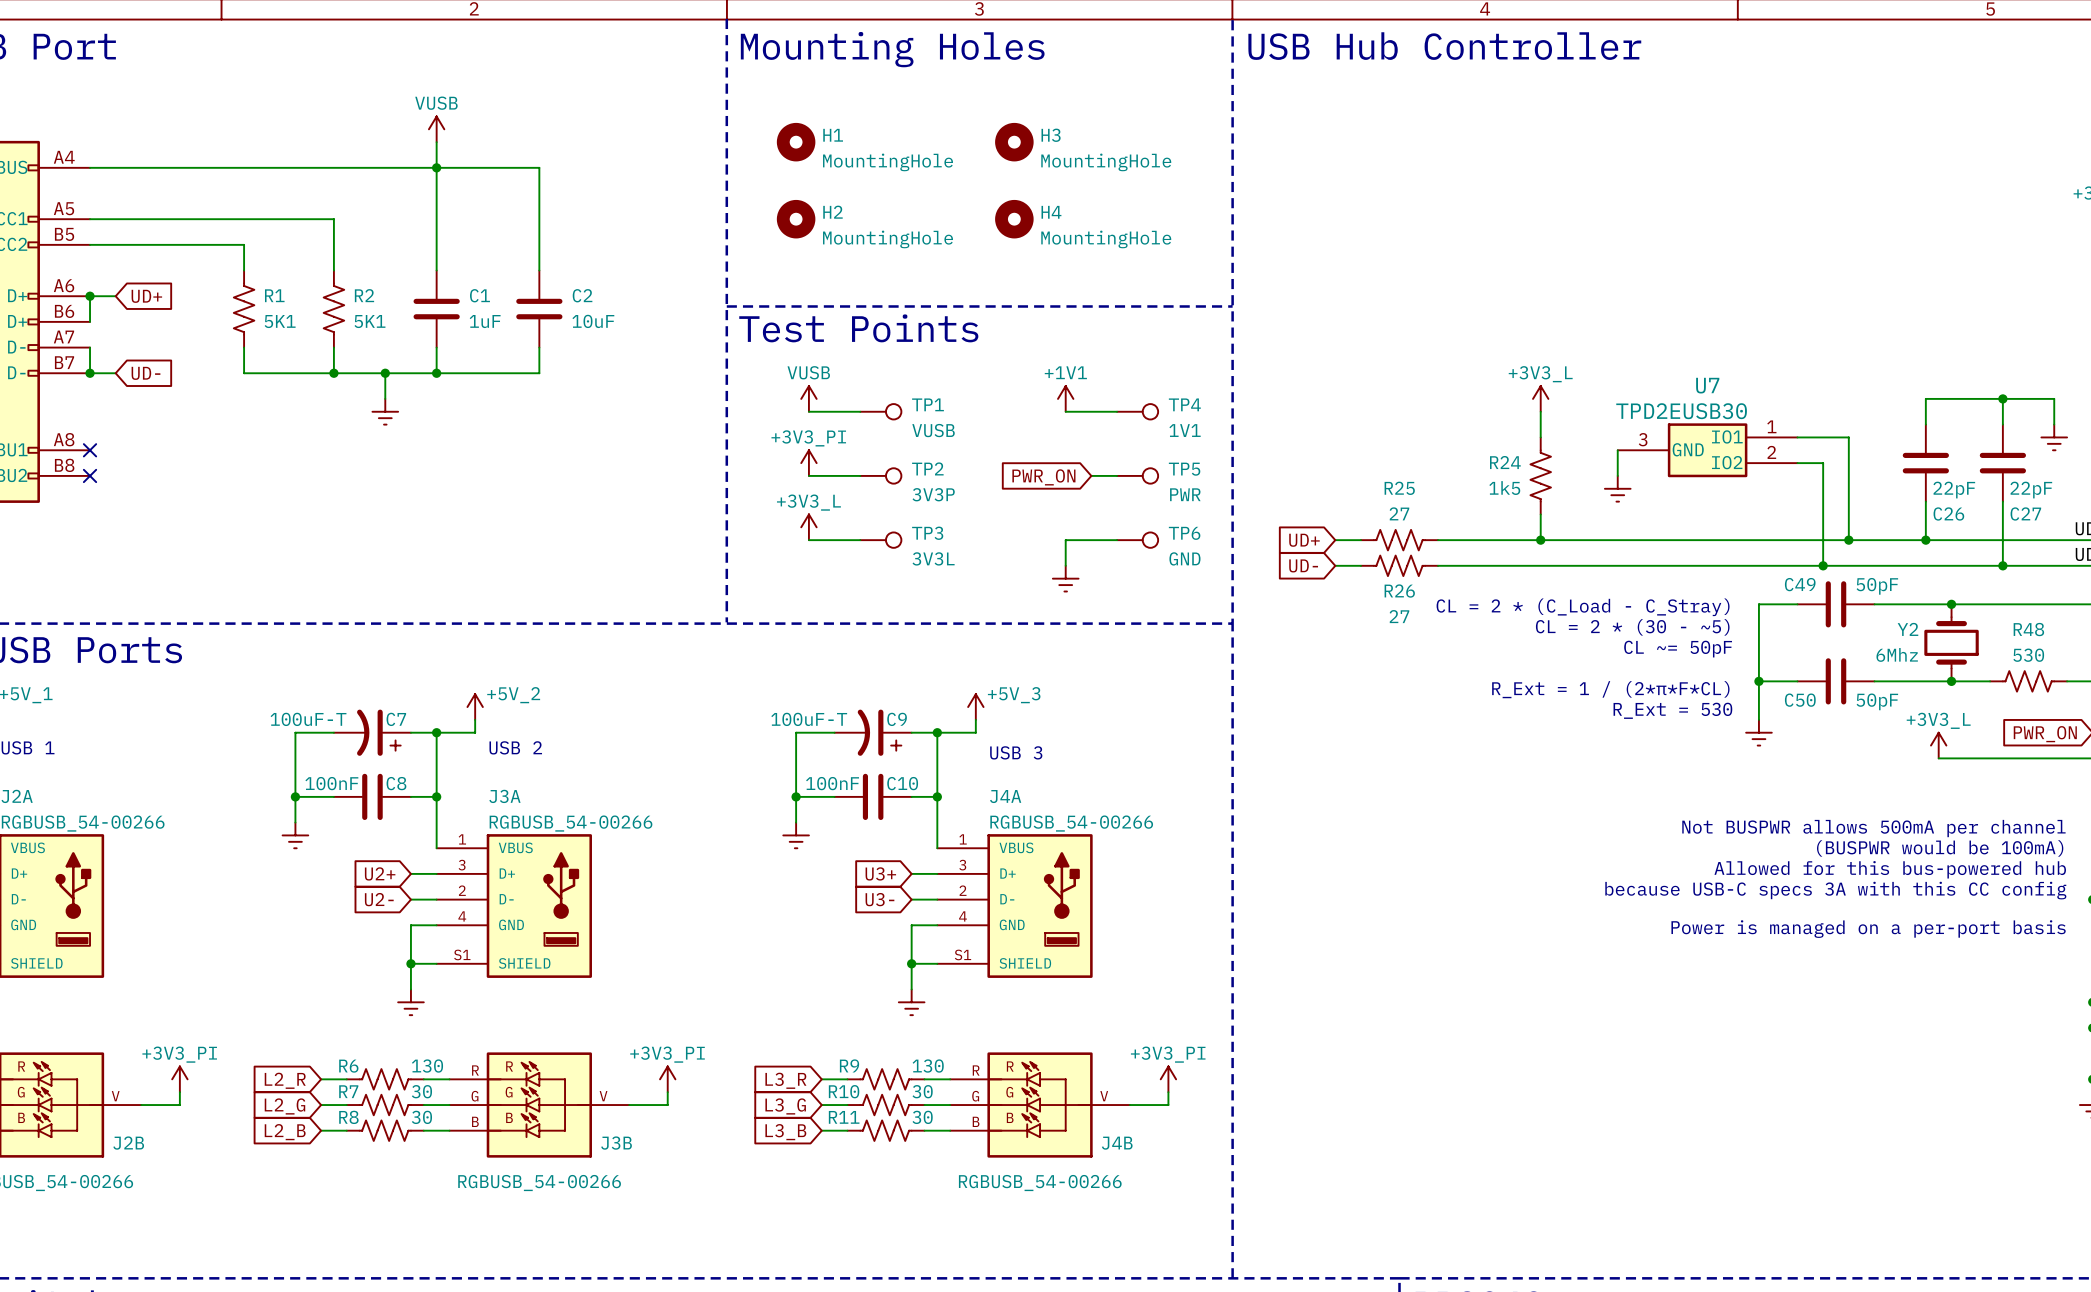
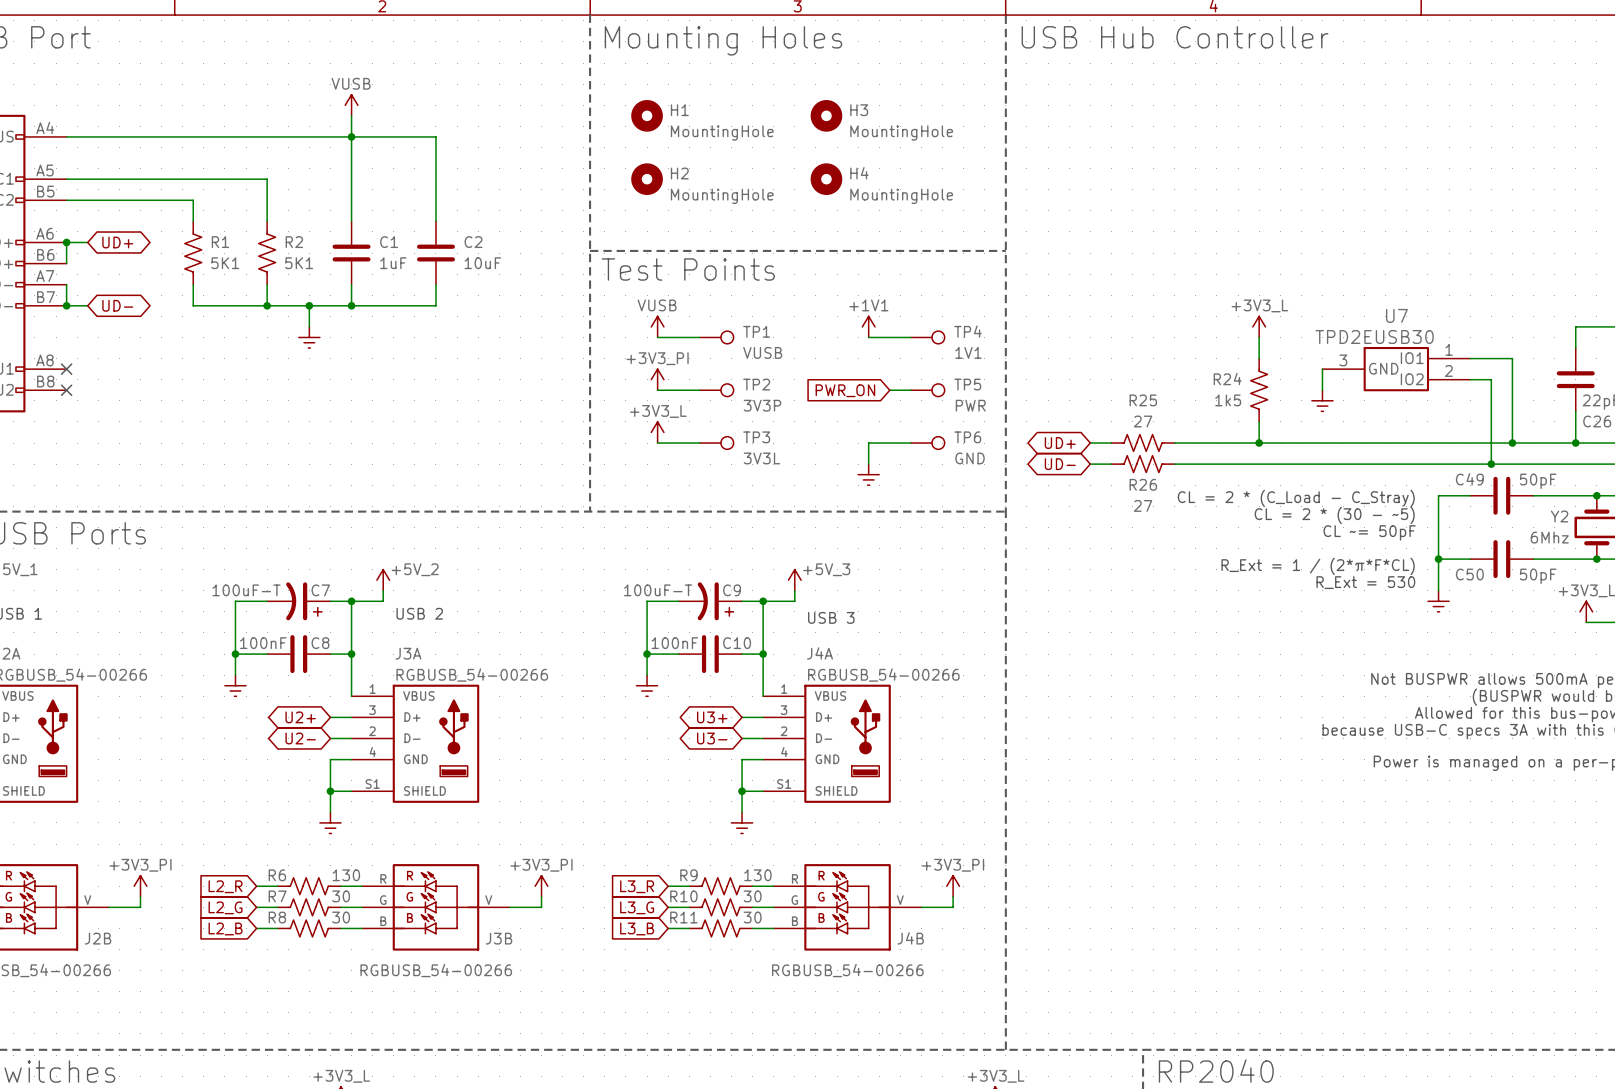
global label shape: input (146, 296) -> bidirectional (117, 242)
global label shape: input (146, 373) -> bidirectional (117, 305)
global label shape: input (1304, 540) -> bidirectional (1060, 443)
global label shape: input (1303, 565) -> bidirectional (1060, 464)
global label shape: input (380, 873) -> bidirectional (300, 717)
global label shape: input (880, 873) -> bidirectional (712, 717)
global label shape: input (379, 899) -> bidirectional (300, 738)
global label shape: input (879, 899) -> bidirectional (712, 738)

